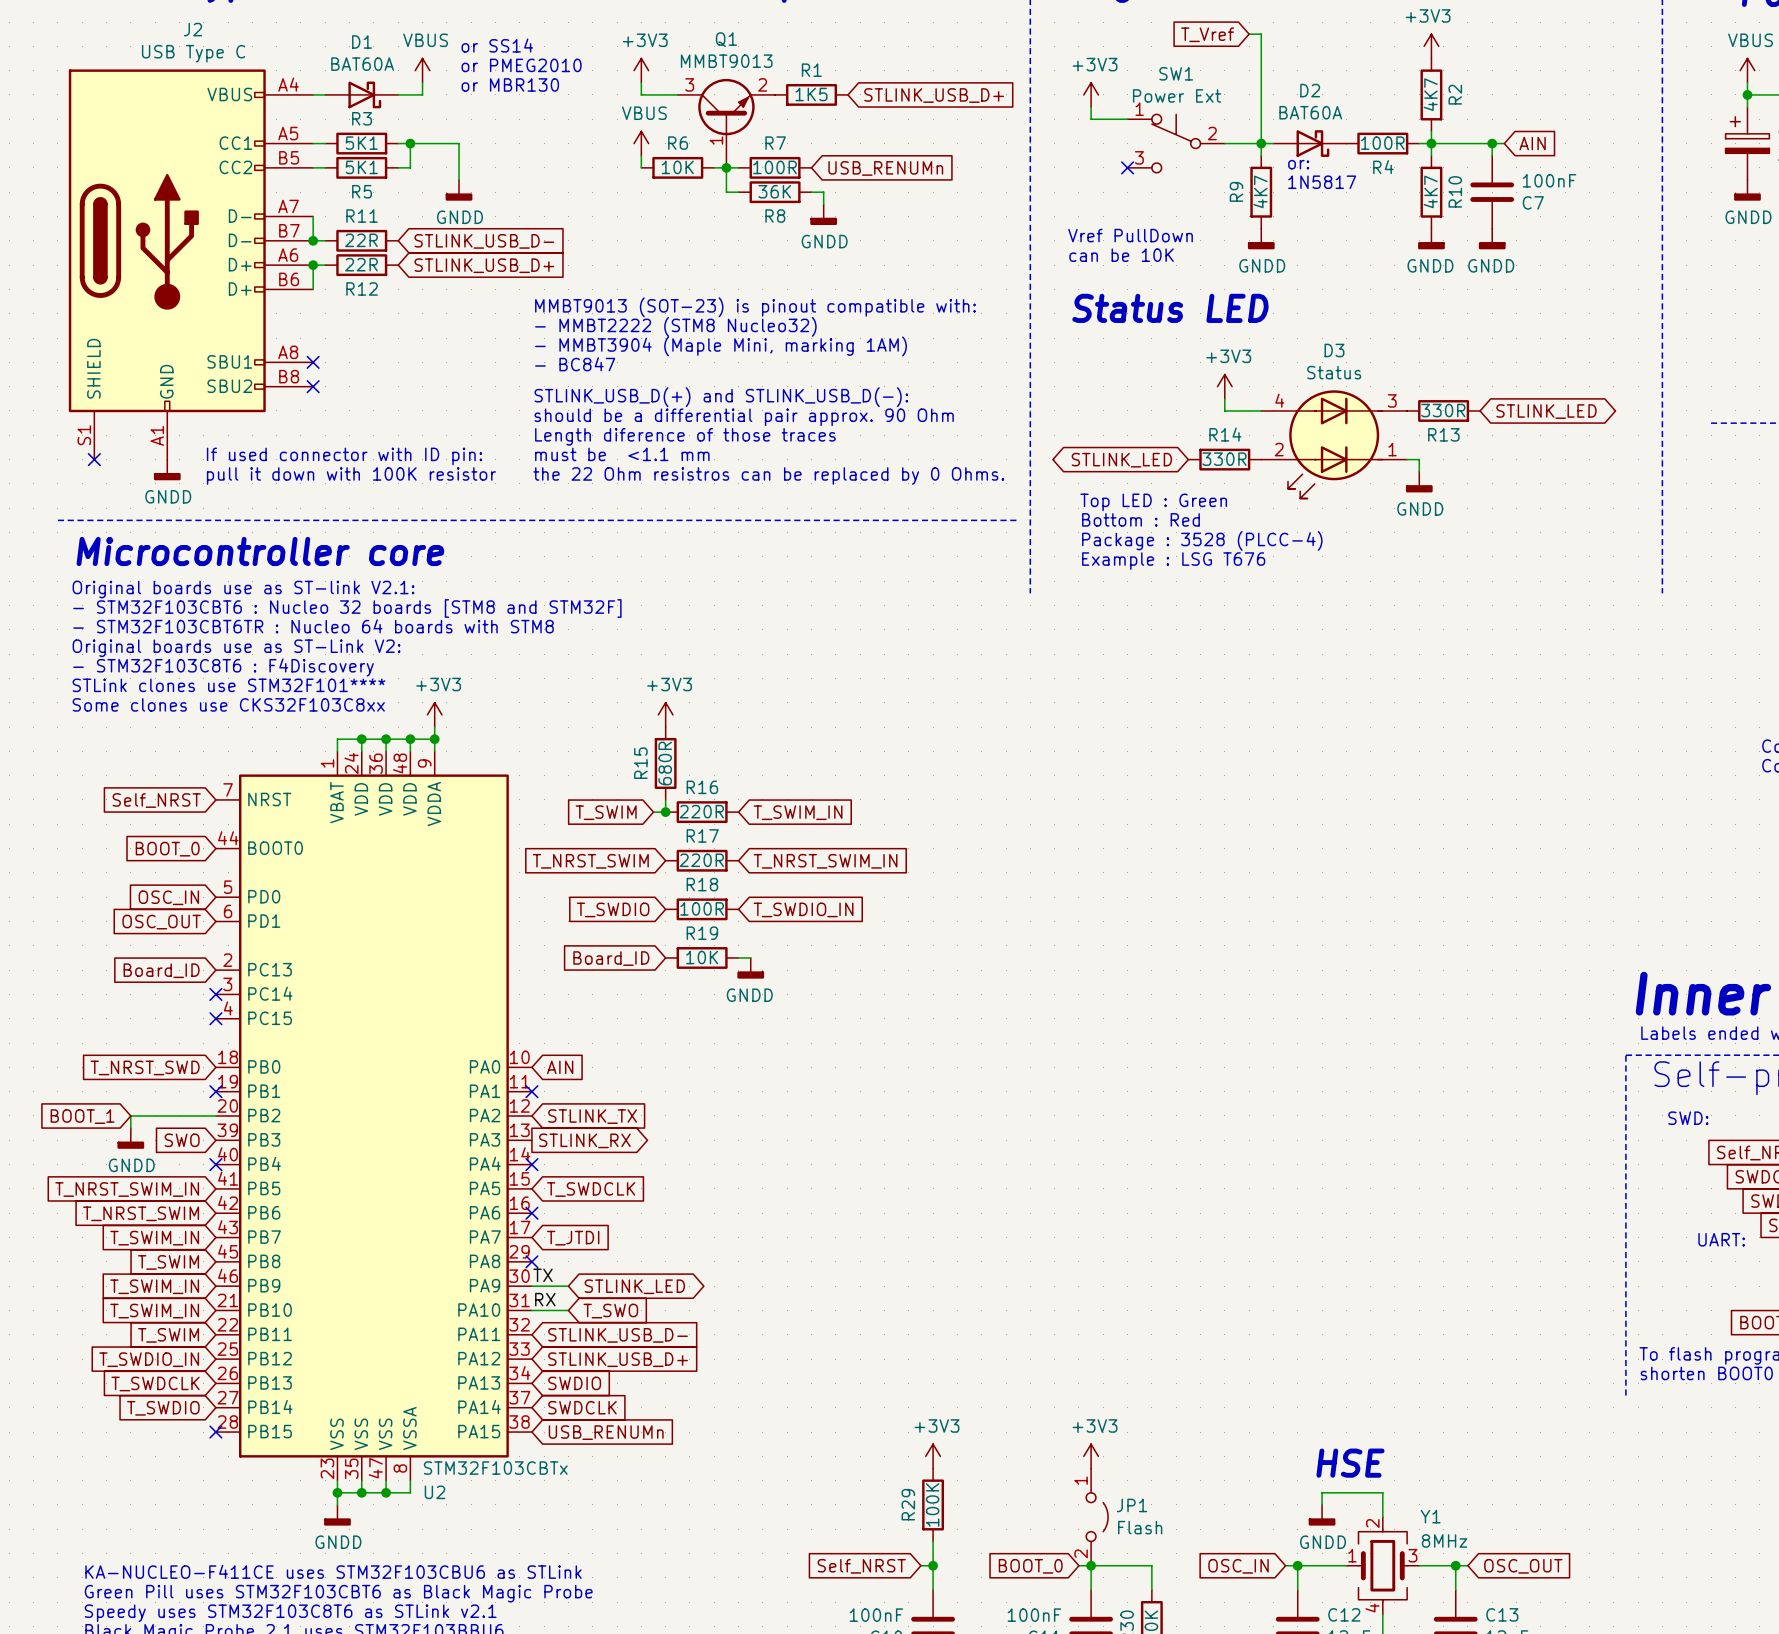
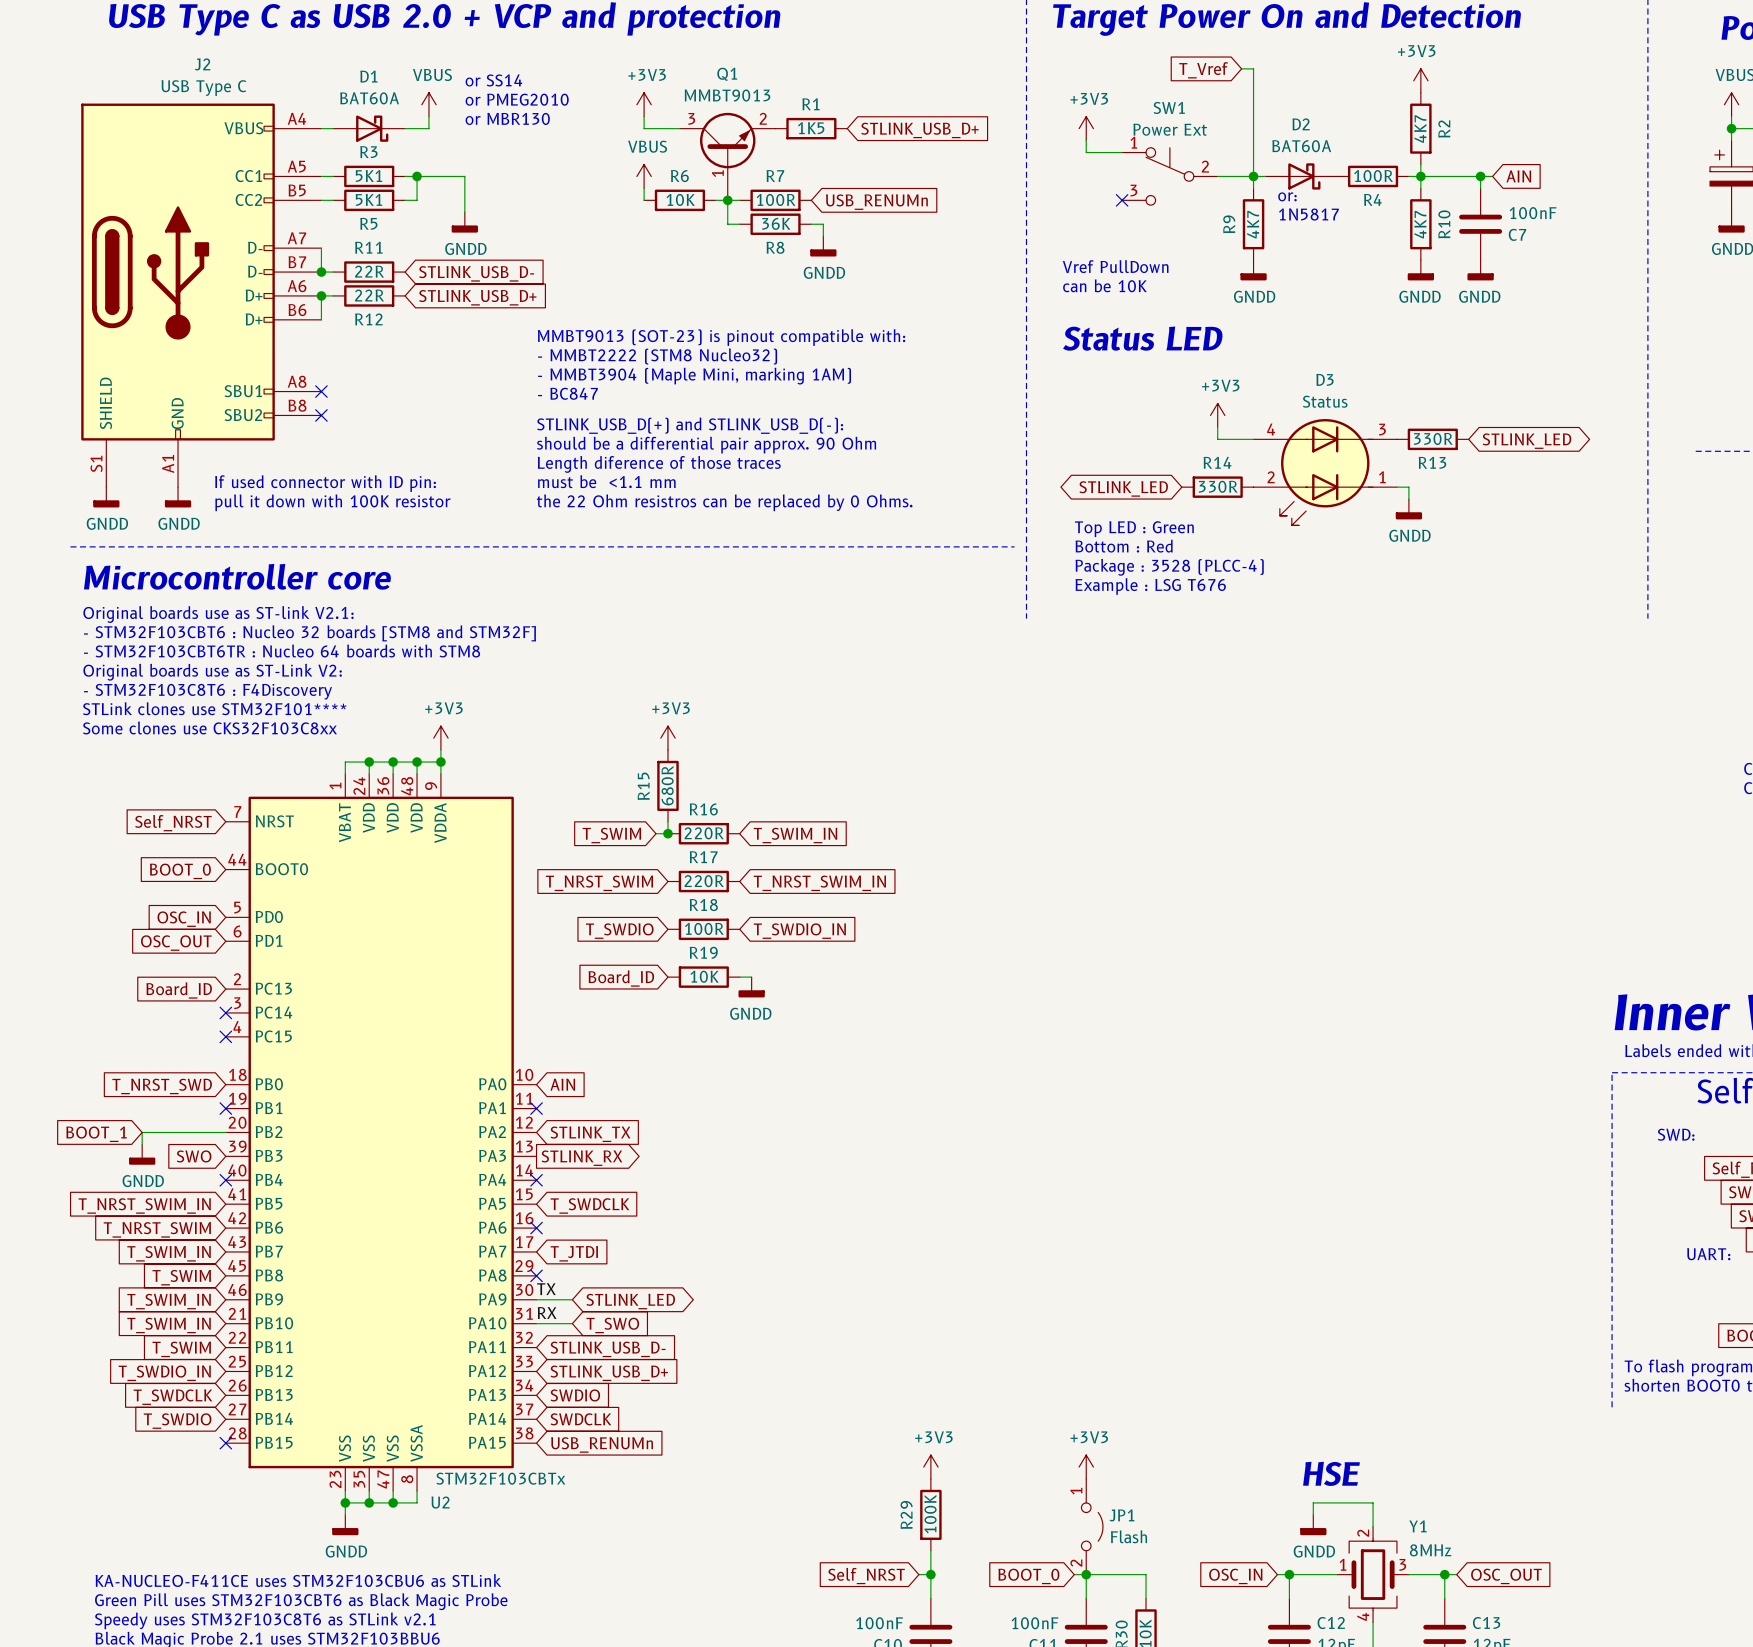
no-connect mark: (94, 459) -> none
power symbol: none -> GNDD (106, 497)

